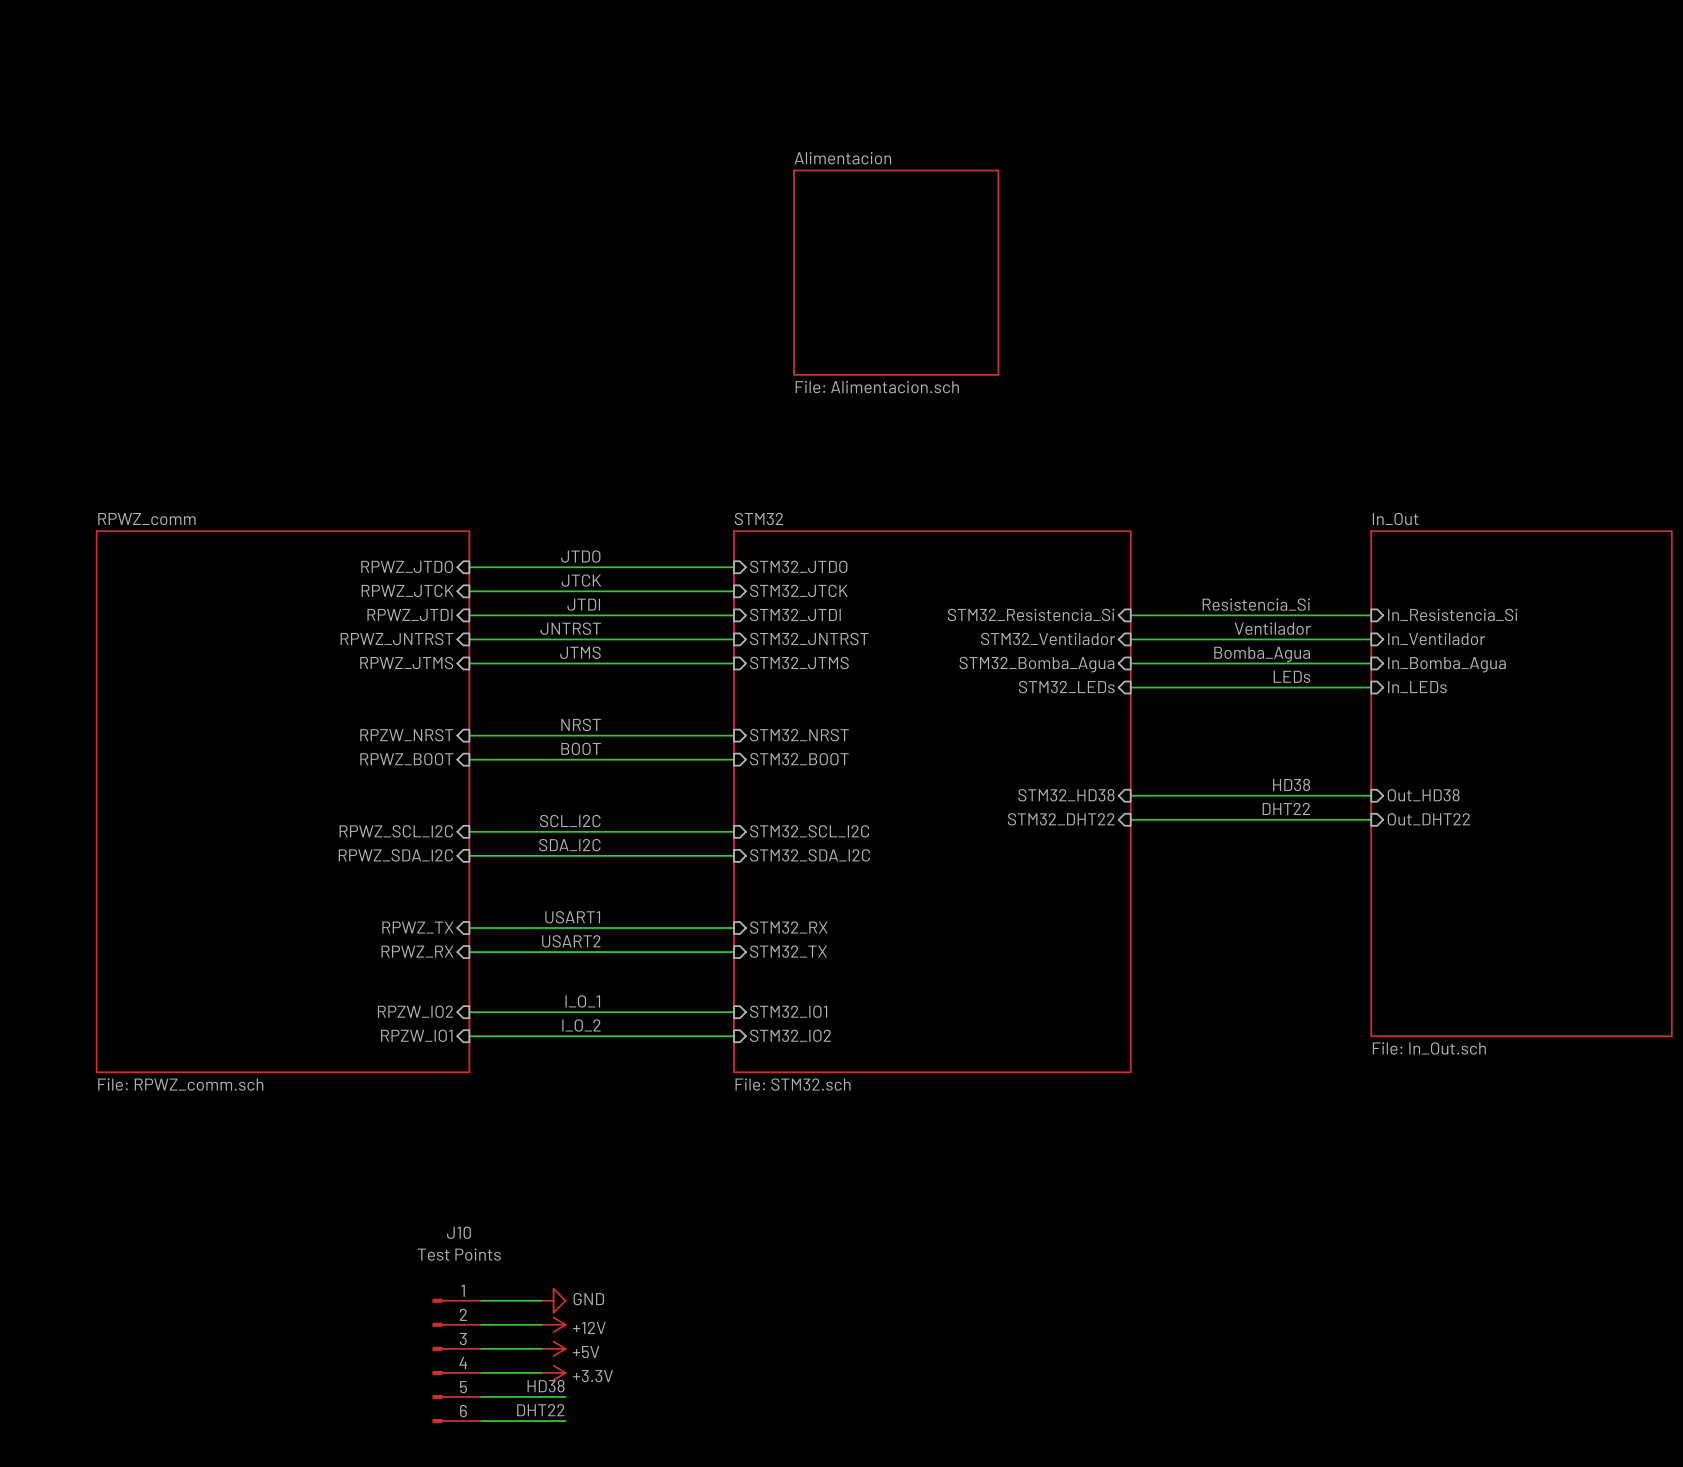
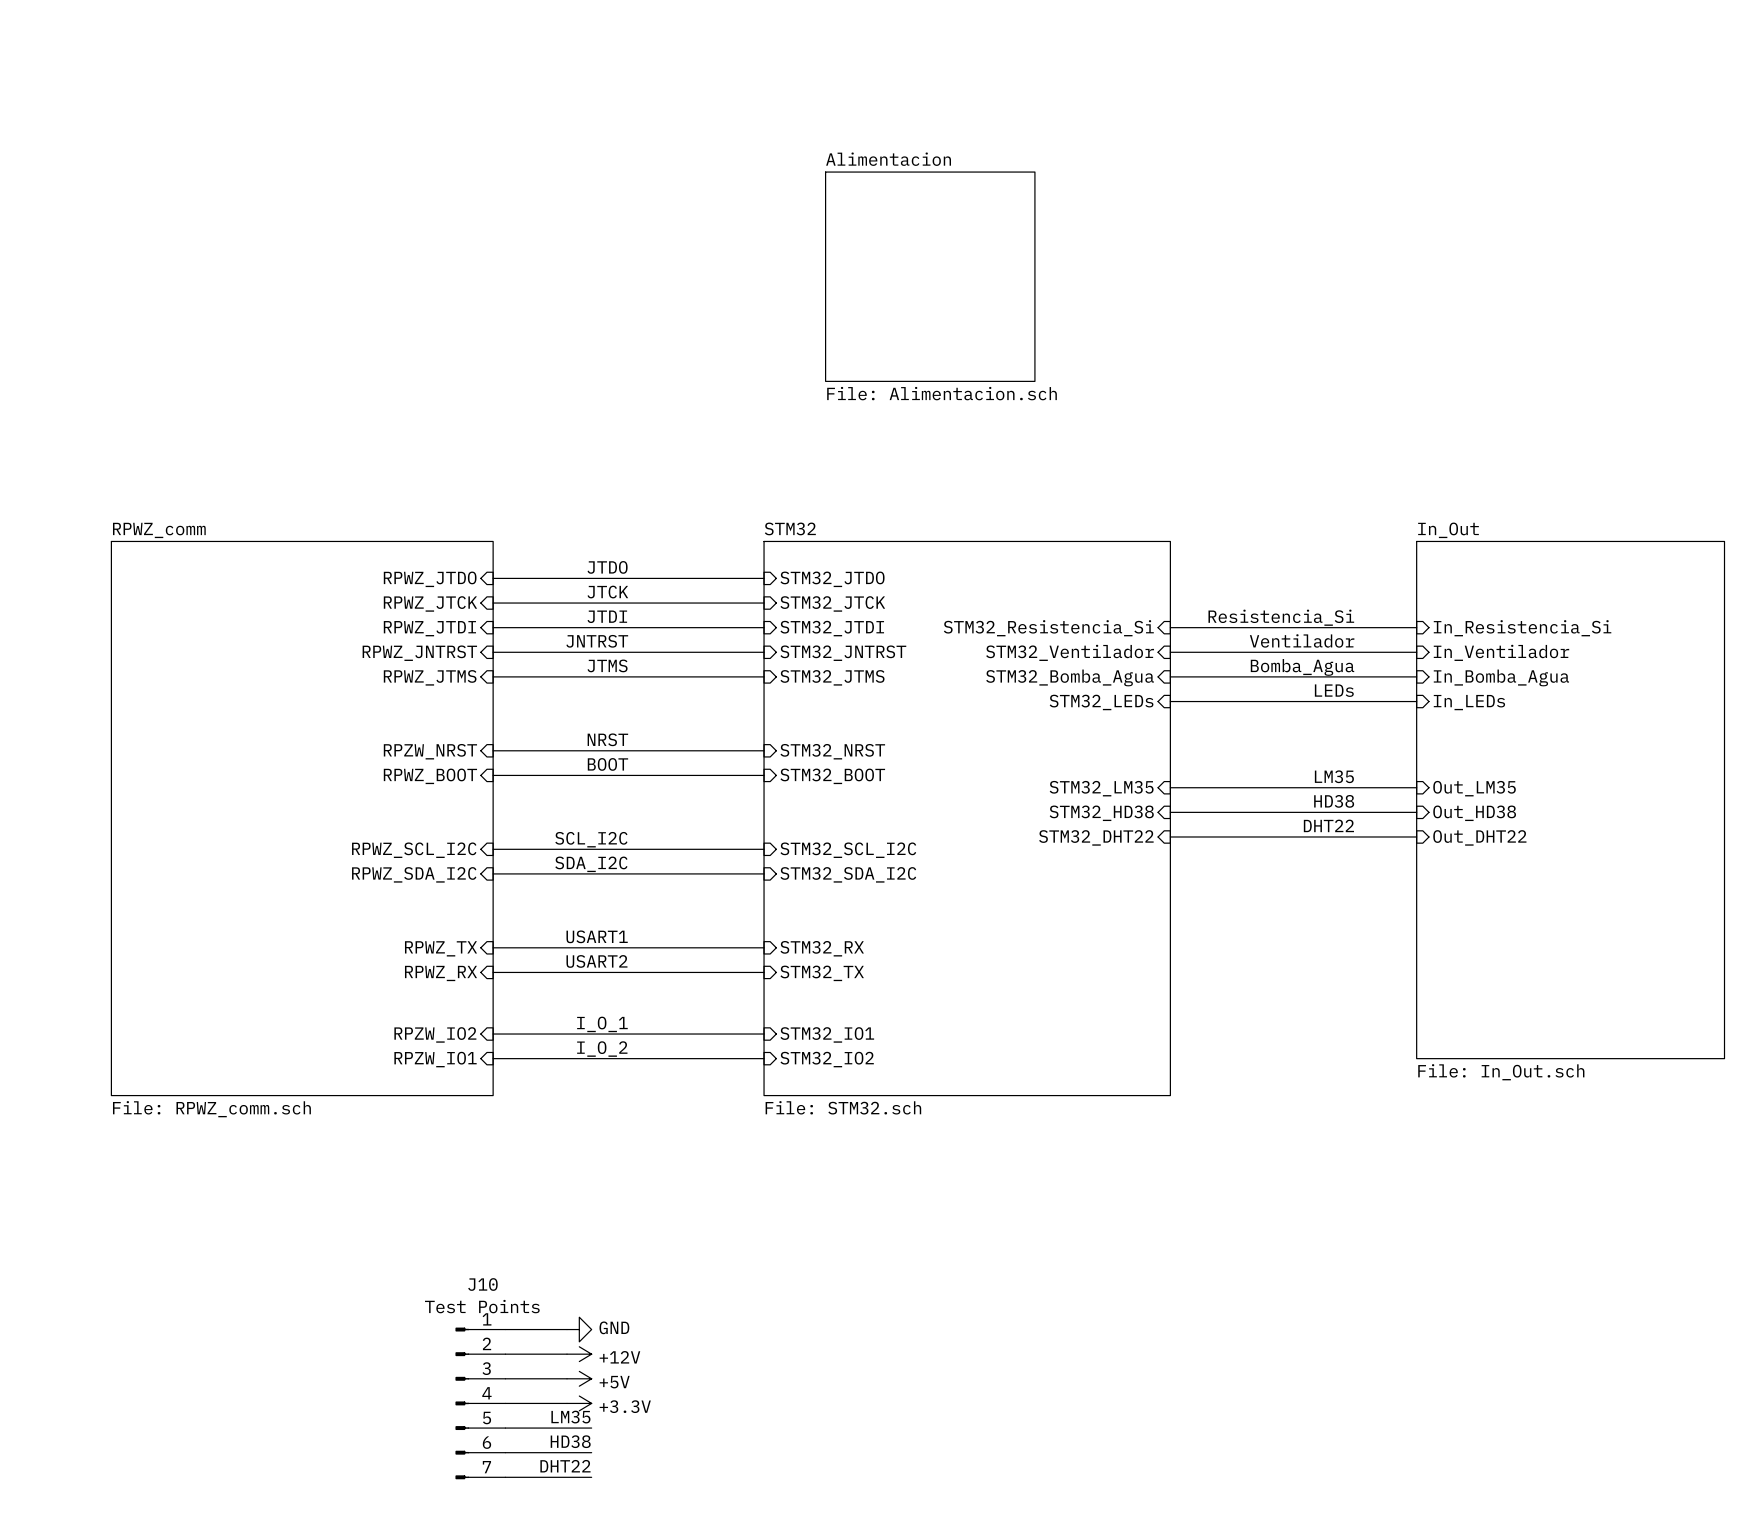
label: none -> LM35 (1334, 776)
sheet pin: none -> STM32_LM35 (1101, 788)
wire: none -> (1170, 787) (1416, 787)
sheet pin: none -> Out_LM35 (1474, 788)
J10 symbol: [432, 1298, 482, 1423] -> [455, 1327, 506, 1480]
label: HD38 (546, 1386) -> LM35 (570, 1417)
label: DHT22 (540, 1410) -> HD38 (570, 1441)
label: none -> DHT22 (565, 1466)
wire: none -> (505, 1477) (591, 1477)

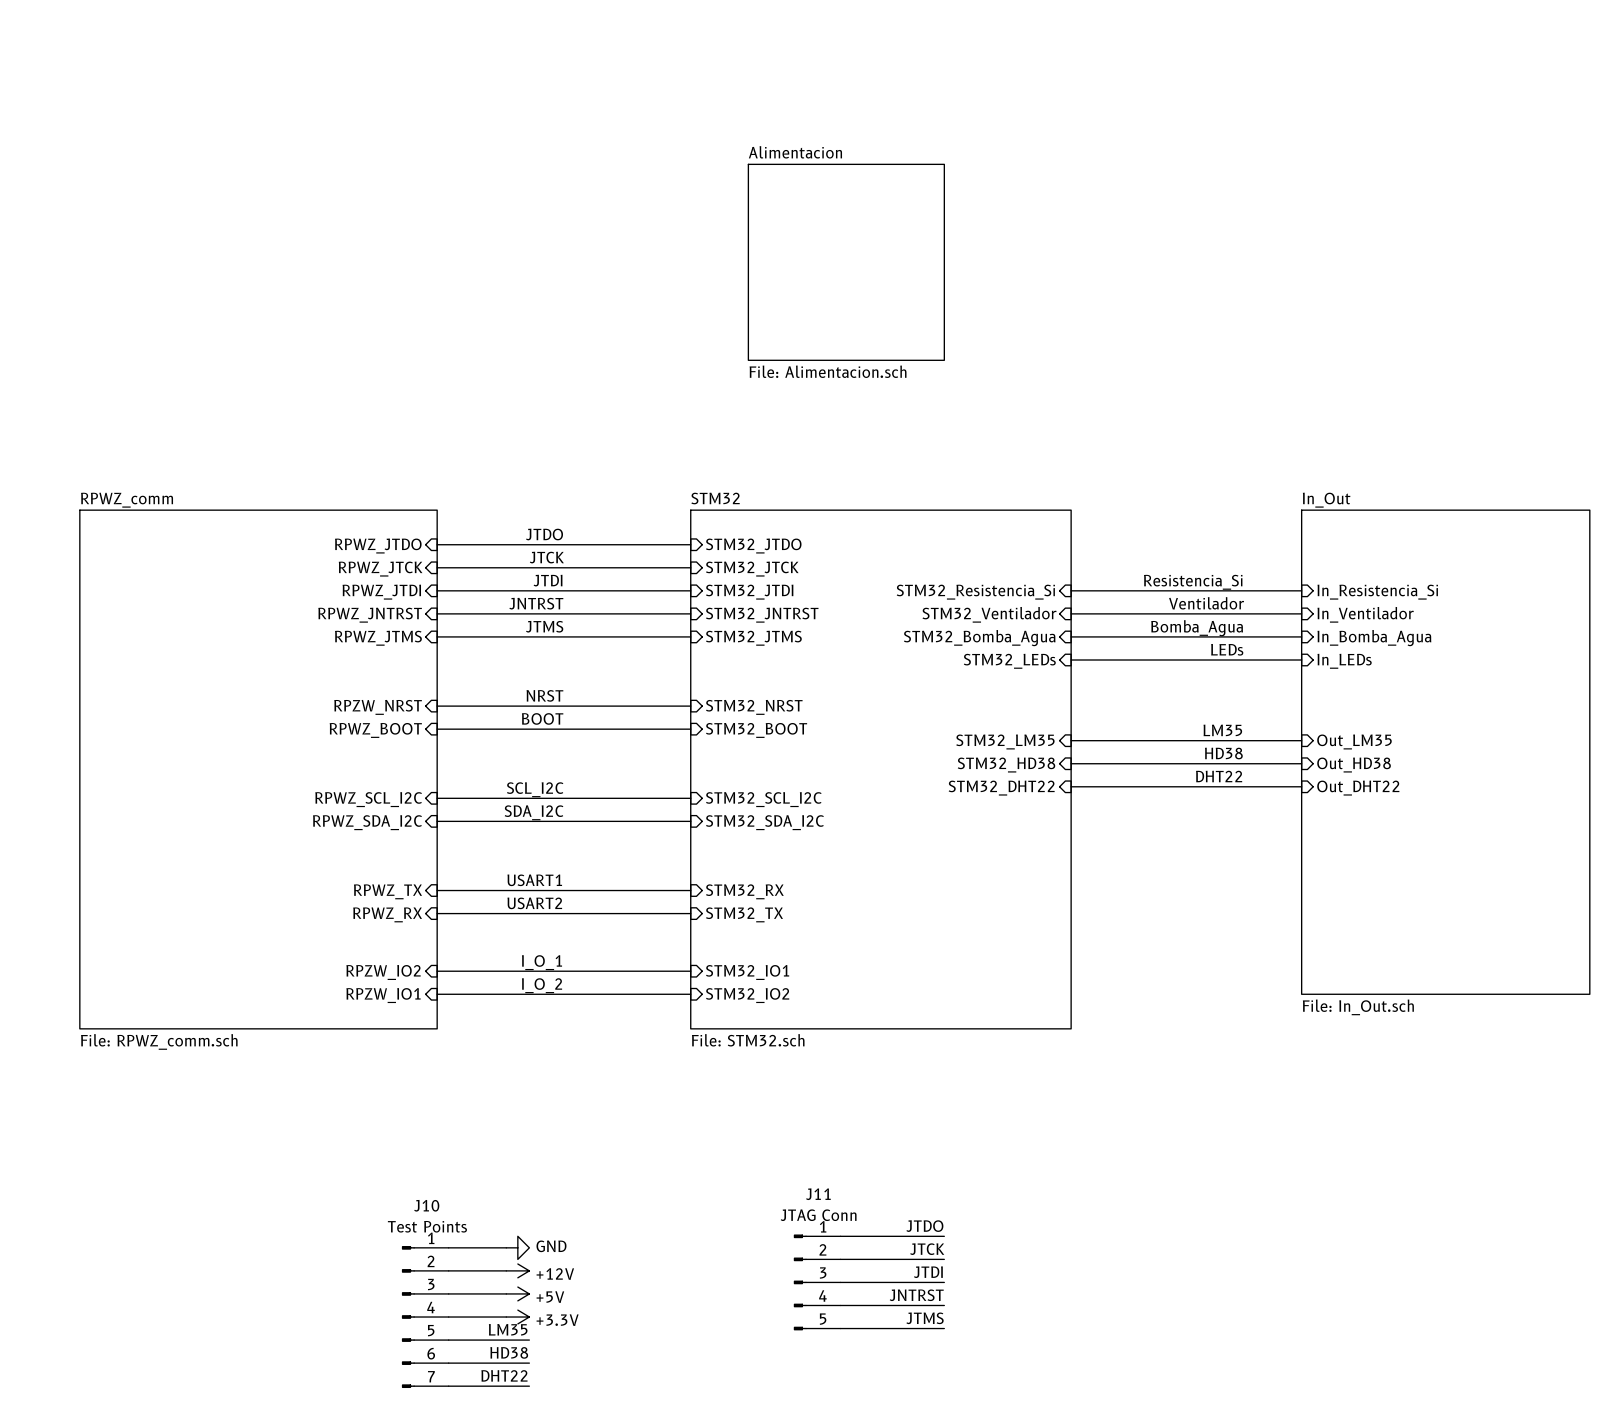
label: none -> JTDO (924, 1226)
wire: none -> (840, 1236) (944, 1236)
label: none -> JTCK (927, 1249)
wire: none -> (840, 1259) (944, 1259)
label: none -> JTDI (928, 1272)
J11: none -> JTAG Conn (817, 1282)
wire: none -> (840, 1282) (944, 1282)
label: none -> JNTRST (916, 1295)
wire: none -> (840, 1305) (944, 1305)
label: none -> JTMS (925, 1318)
wire: none -> (840, 1328) (944, 1328)

